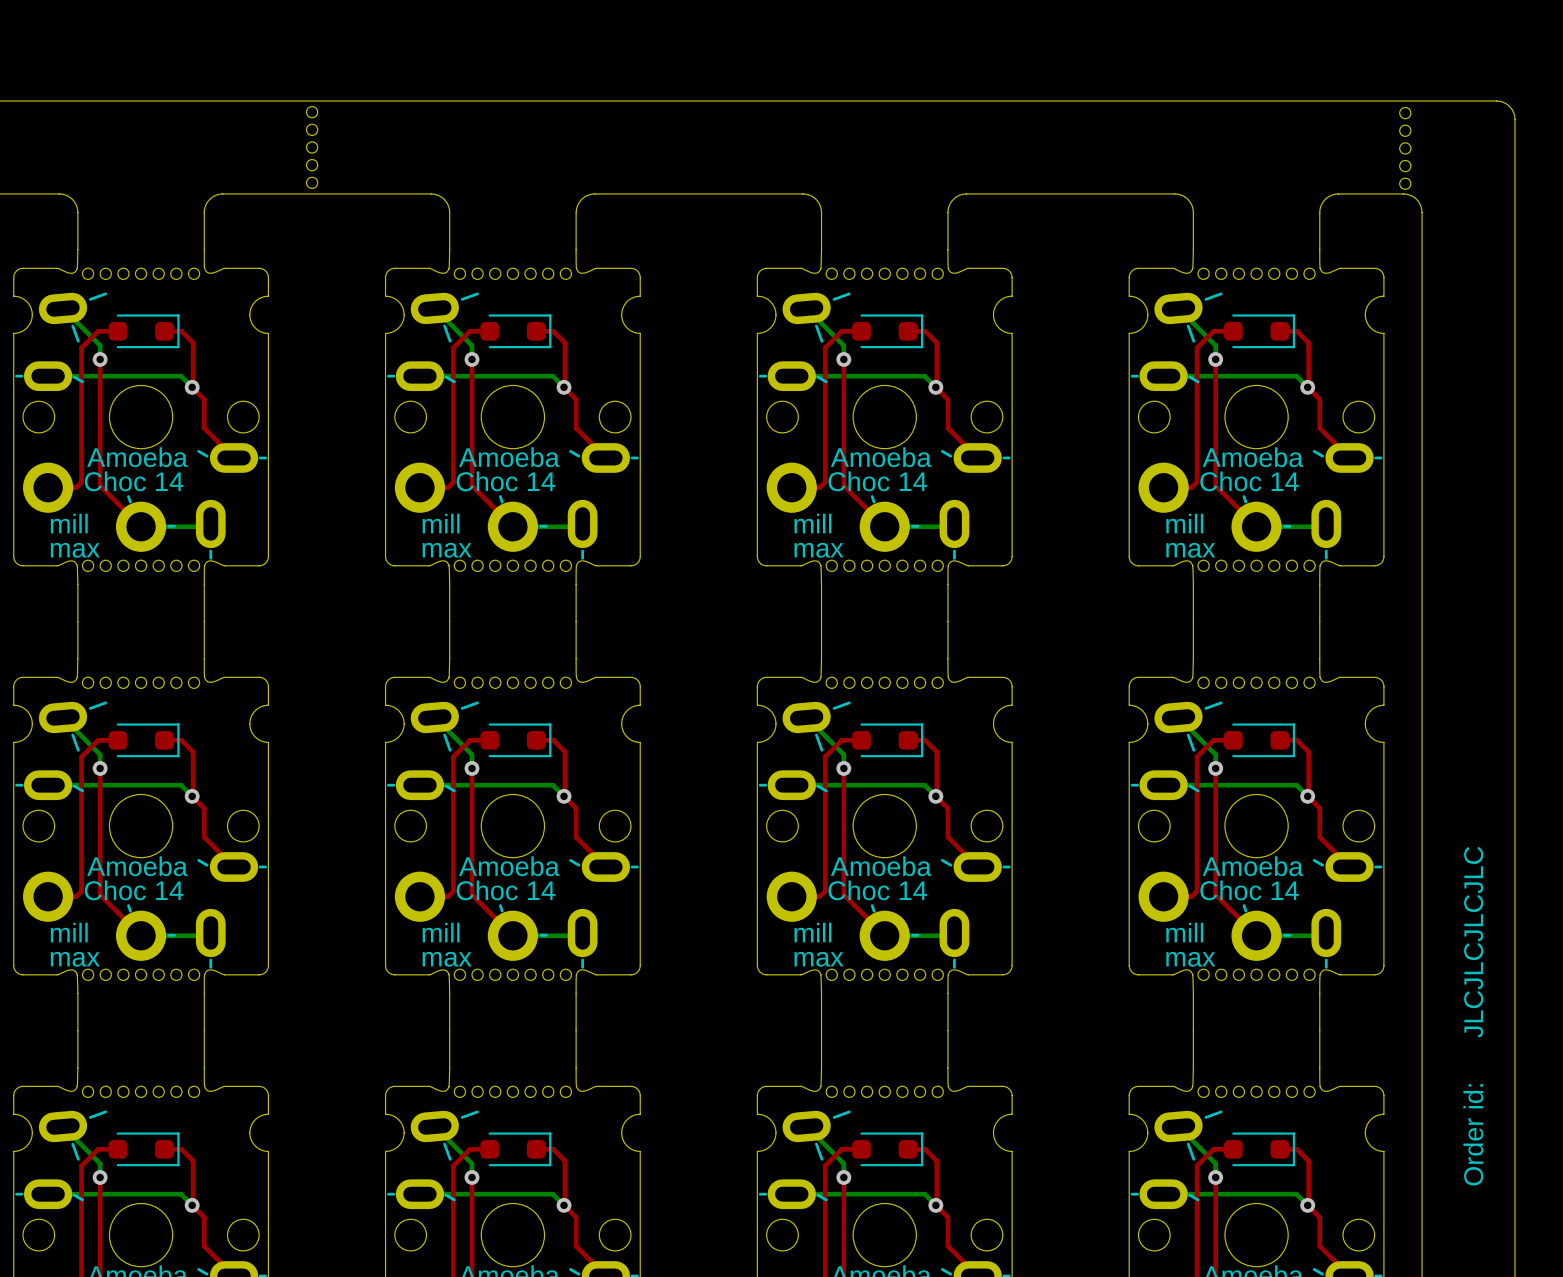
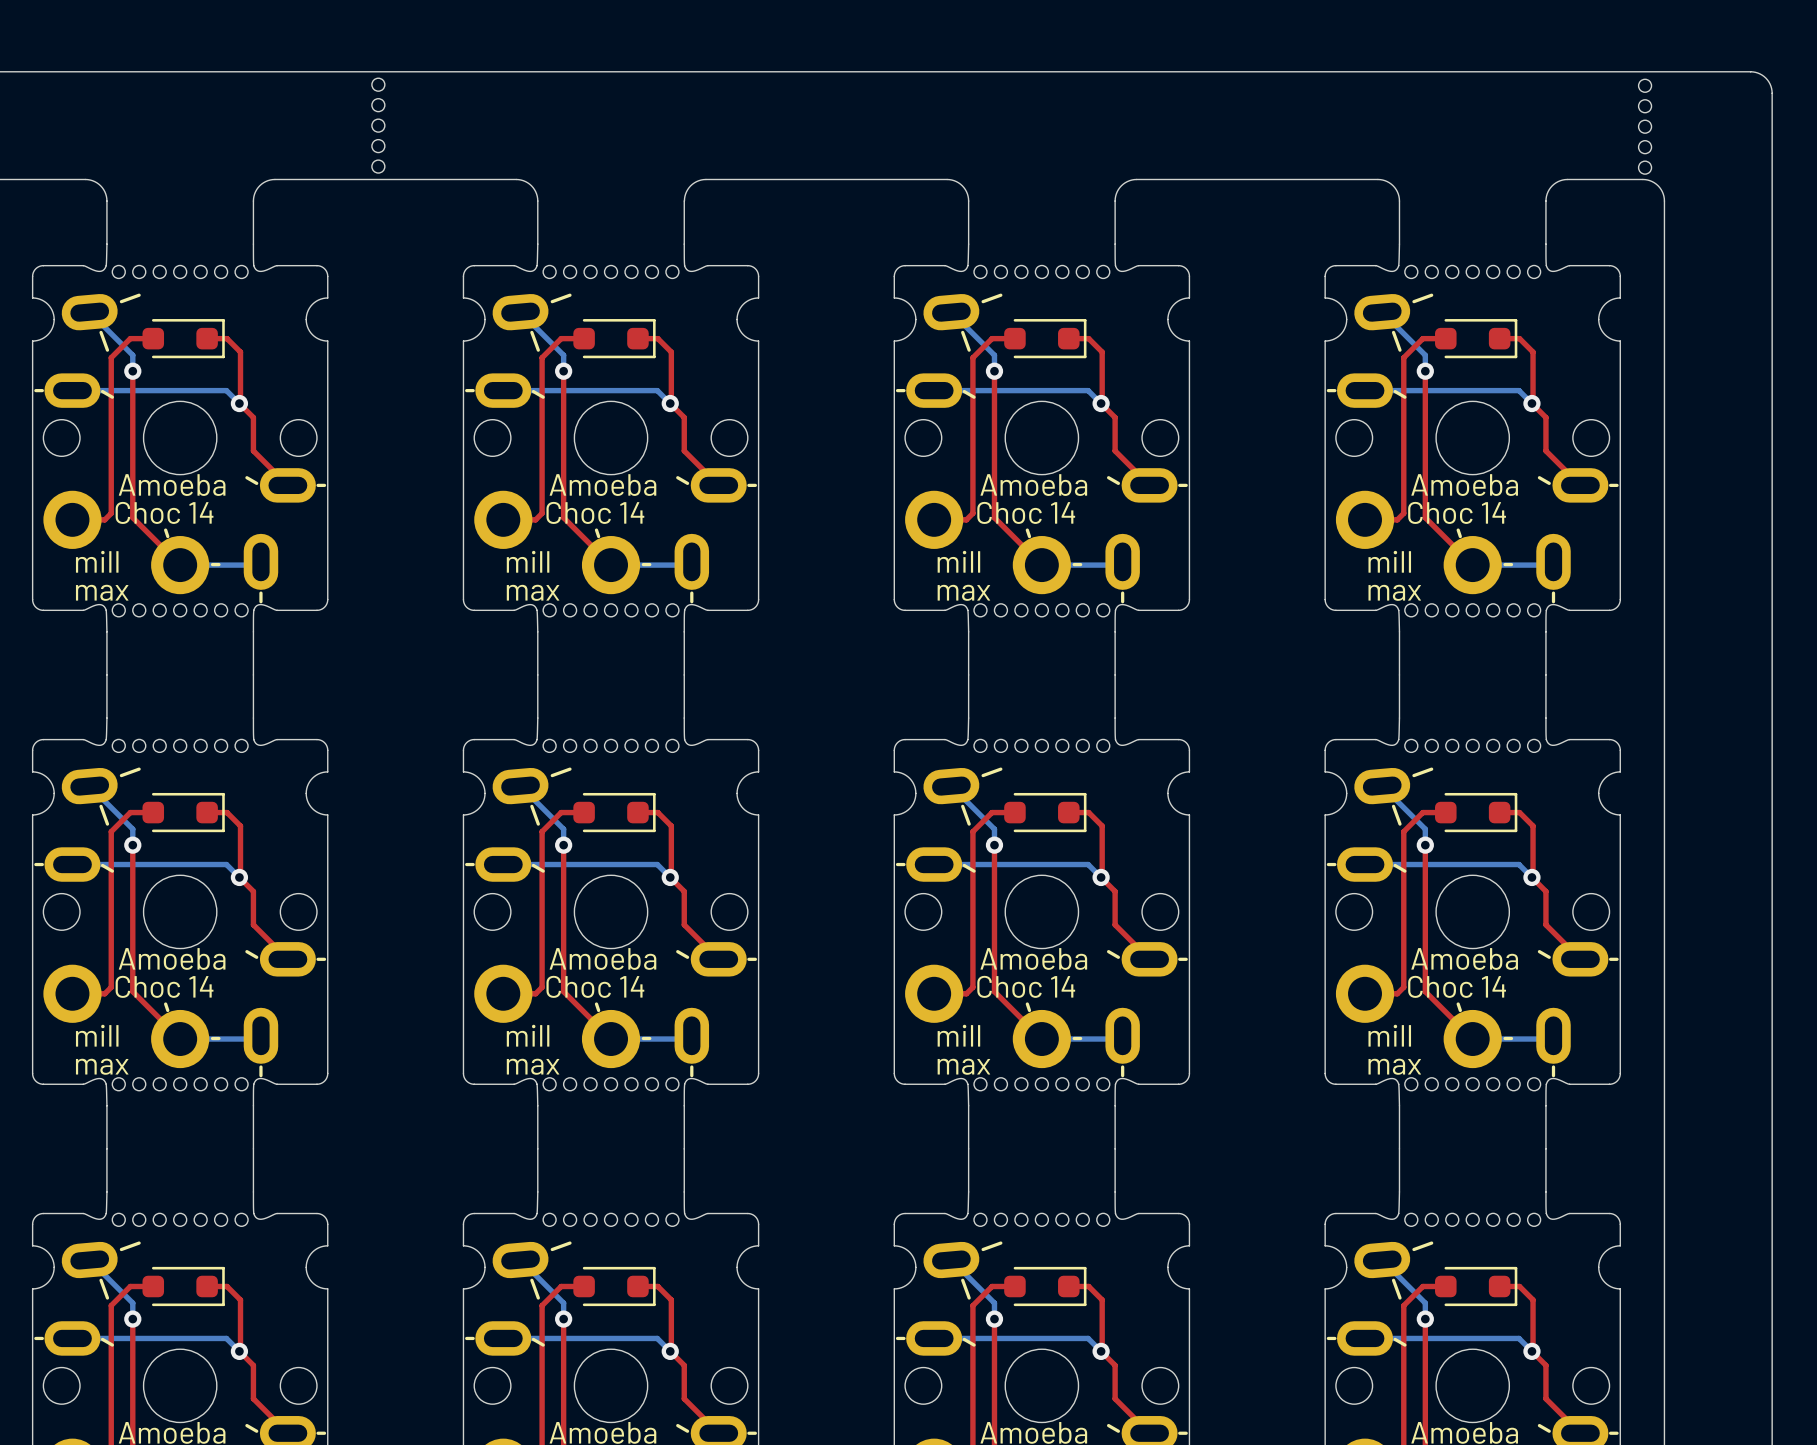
text: JLCJLCJLCJLC (1473, 942) -> none
text: Order id: (1473, 1134) -> none

